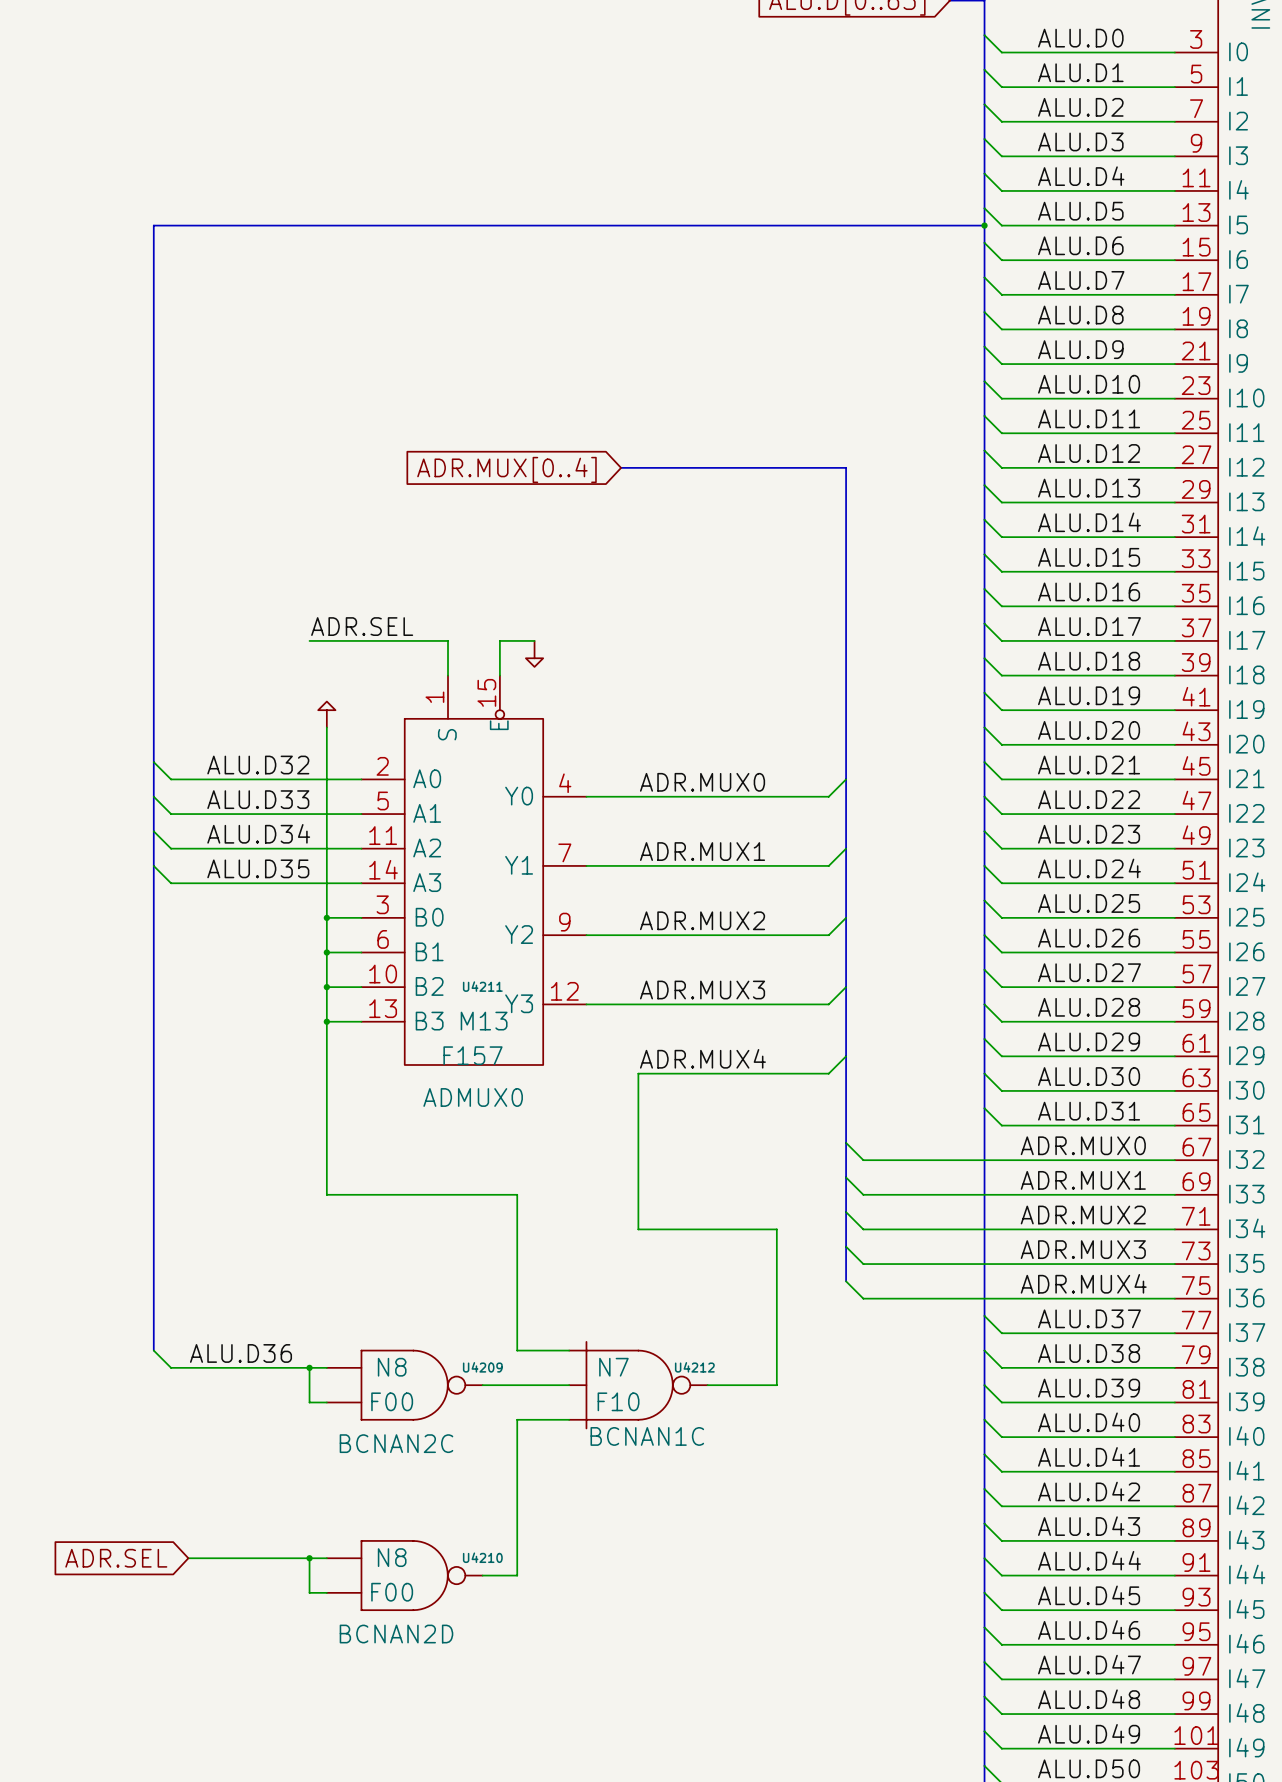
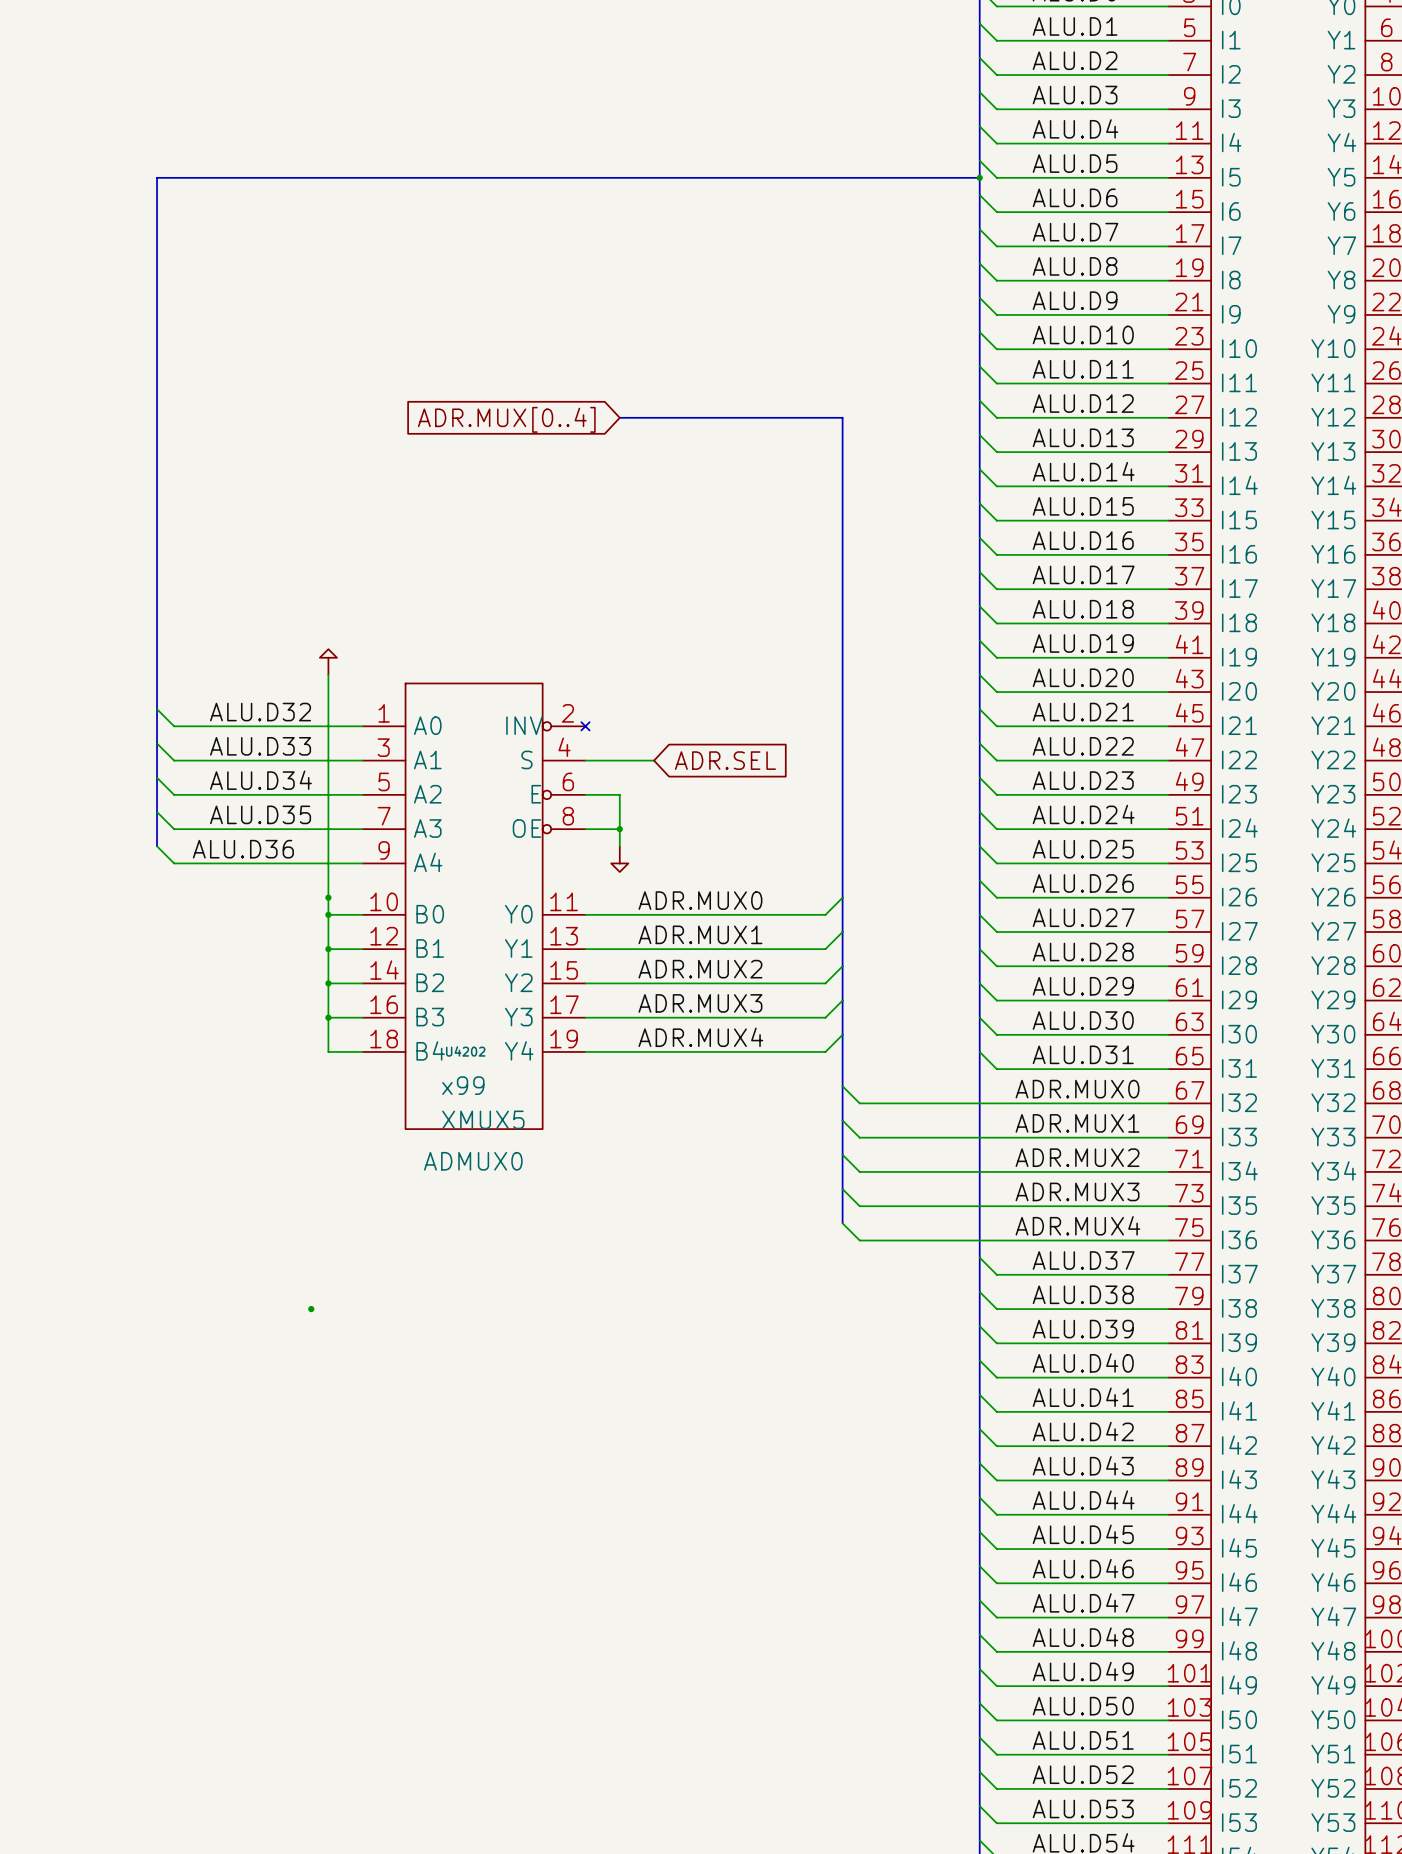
label: ADR.SEL (362, 626) -> none
wire: (309, 640) (448, 640) (448, 675) -> none
wire: (534, 640) (499, 640) (499, 675) -> none
power symbol: (534, 654) -> none
no-connect mark: none -> (585, 726)
wire: (846, 779) (828, 796) (586, 796) -> none
label: ADR.MUX0 (702, 782) -> none
wire: none -> (585, 760) (654, 760)
global label: none -> ADR.SEL (725, 760)
wire: none -> (585, 794) (619, 794) (619, 846)
wire: (846, 848) (828, 865) (586, 865) -> (842, 897) (825, 914) (585, 914)
label: ADR.MUX1 (702, 851) -> none
U4211: F157 (473, 870) -> none
wire: none -> (585, 829) (619, 829)
junction: none -> (619, 829)
bus: (153, 900) (153, 1350) -> none
wire: none -> (157, 846) (174, 863) (328, 863)
label: none -> ALU.D36 (243, 849)
power symbol: none -> (619, 859)
junction: (326, 917) -> none
wire: (846, 917) (828, 935) (586, 935) -> (842, 966) (825, 983) (585, 983)
label position: ADR.MUX2 (702, 920) -> ADR.MUX2 (700, 969)
wire: (326, 952) (361, 952) -> (328, 914) (362, 914)
label: none -> ADR.MUX0 (700, 900)
U4202: none -> XMUX5 (474, 906)
junction: none -> (328, 914)
wire: (326, 987) (361, 987) -> (328, 949) (362, 949)
junction: (326, 987) -> none
label: ADR.MUX3 (702, 990) -> ADR.MUX1 (700, 934)
junction: none -> (328, 949)
wire: (326, 1021) (361, 1021) -> (328, 983) (362, 983)
junction: (326, 1021) -> none
junction: none -> (328, 983)
label: ADR.MUX4 (702, 1058) -> ADR.MUX3 (700, 1003)
wire: none -> (328, 1017) (362, 1017)
junction: none -> (328, 1017)
wire: (638, 1073) (638, 1229) (776, 1229) (776, 1385) (707, 1385) -> (636, 1017) (585, 1017)
wire: none -> (842, 1034) (825, 1051) (585, 1051)
label: none -> ADR.MUX4 (700, 1037)
wire: (326, 1108) (326, 1194) (517, 1194) (517, 1350) (569, 1350) -> (328, 1051) (362, 1051)
wire: (153, 1350) (171, 1367) (326, 1367) -> none
label: ALU.D36 (241, 1353) -> none
wire: (309, 1367) (309, 1402) (326, 1402) -> none
U4209: F00 (404, 1385) -> none
wire: (482, 1385) (569, 1385) -> none
U4212: F10 (638, 1385) -> none
wire: (569, 1419) (517, 1419) (517, 1575) (482, 1575) -> none
global label: ADR.SEL (116, 1558) -> none
wire: (188, 1558) (326, 1558) -> none
wire: (309, 1558) (309, 1592) (326, 1592) -> none
junction: (309, 1558) -> none
U4210: F00 (404, 1575) -> none

